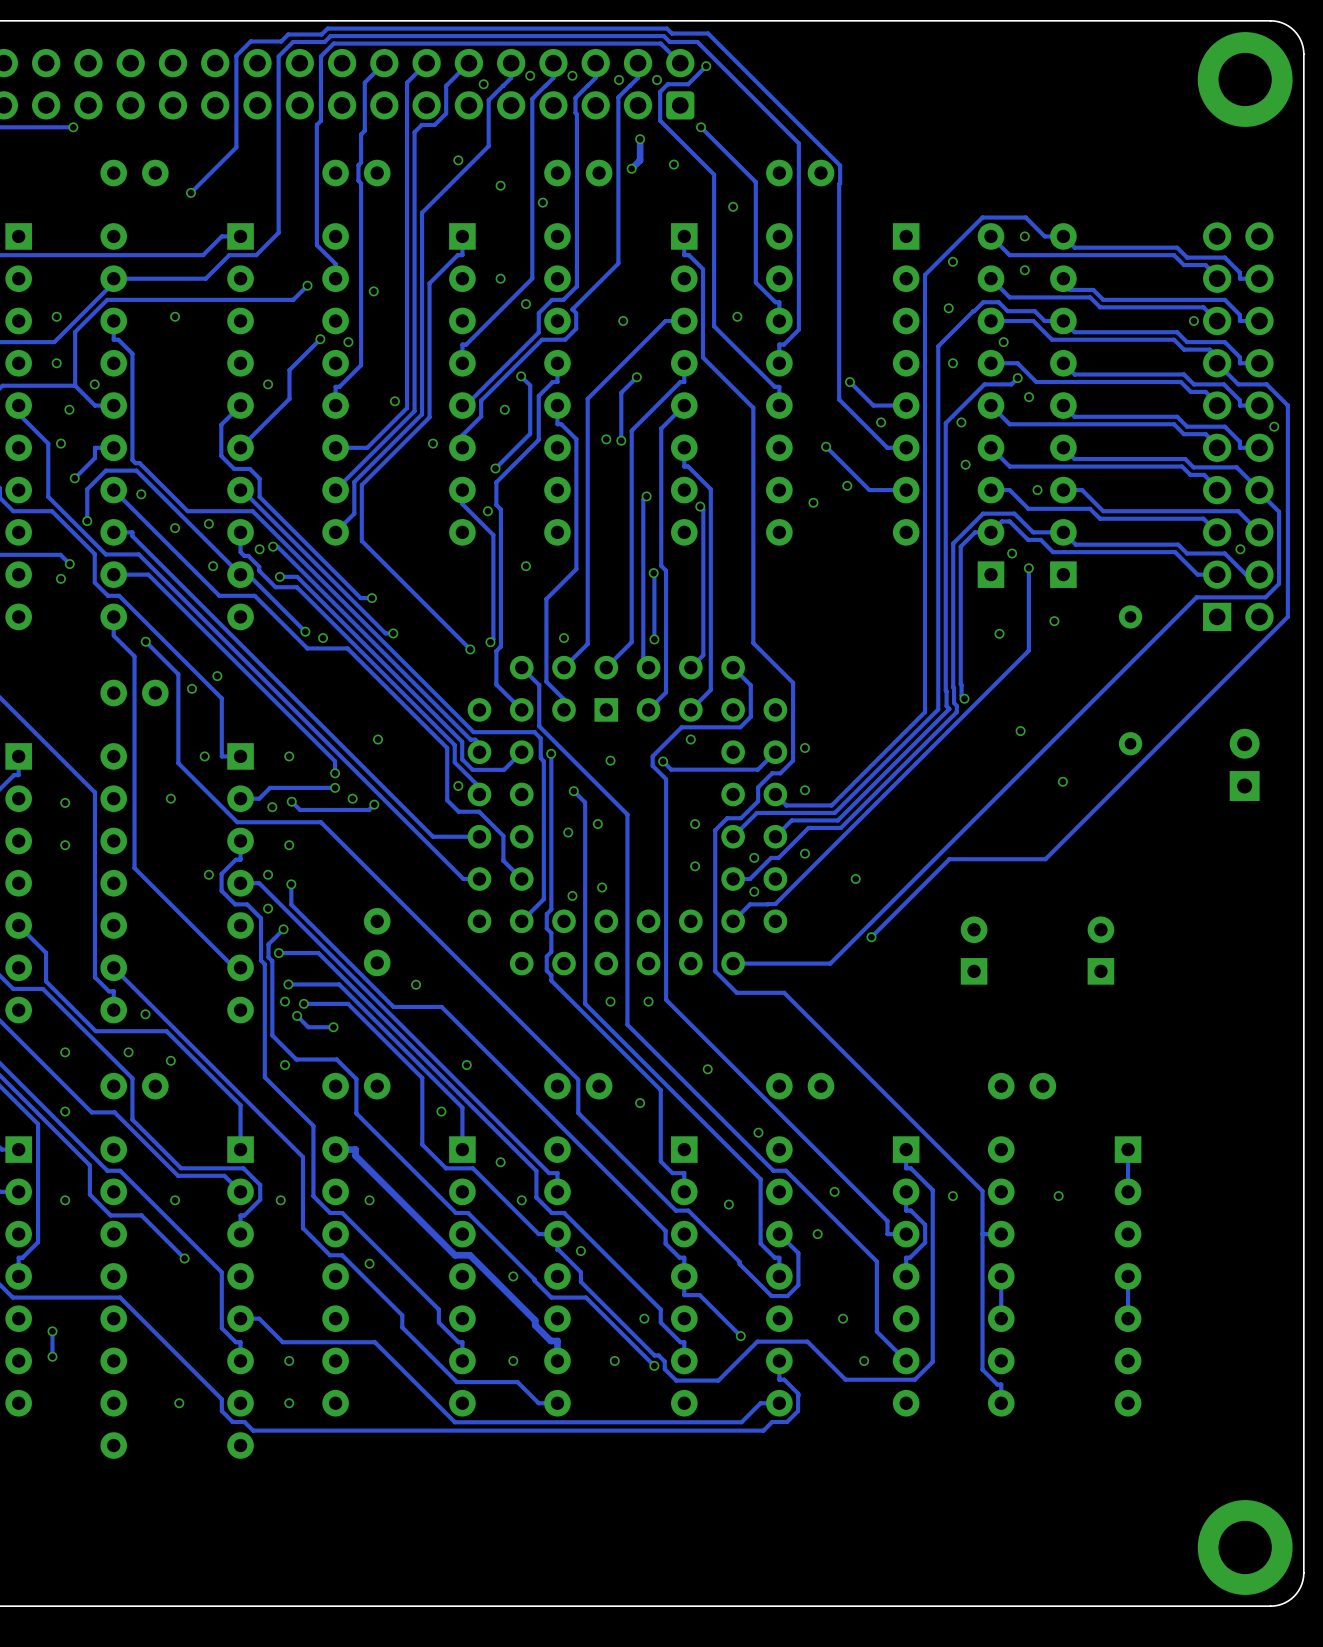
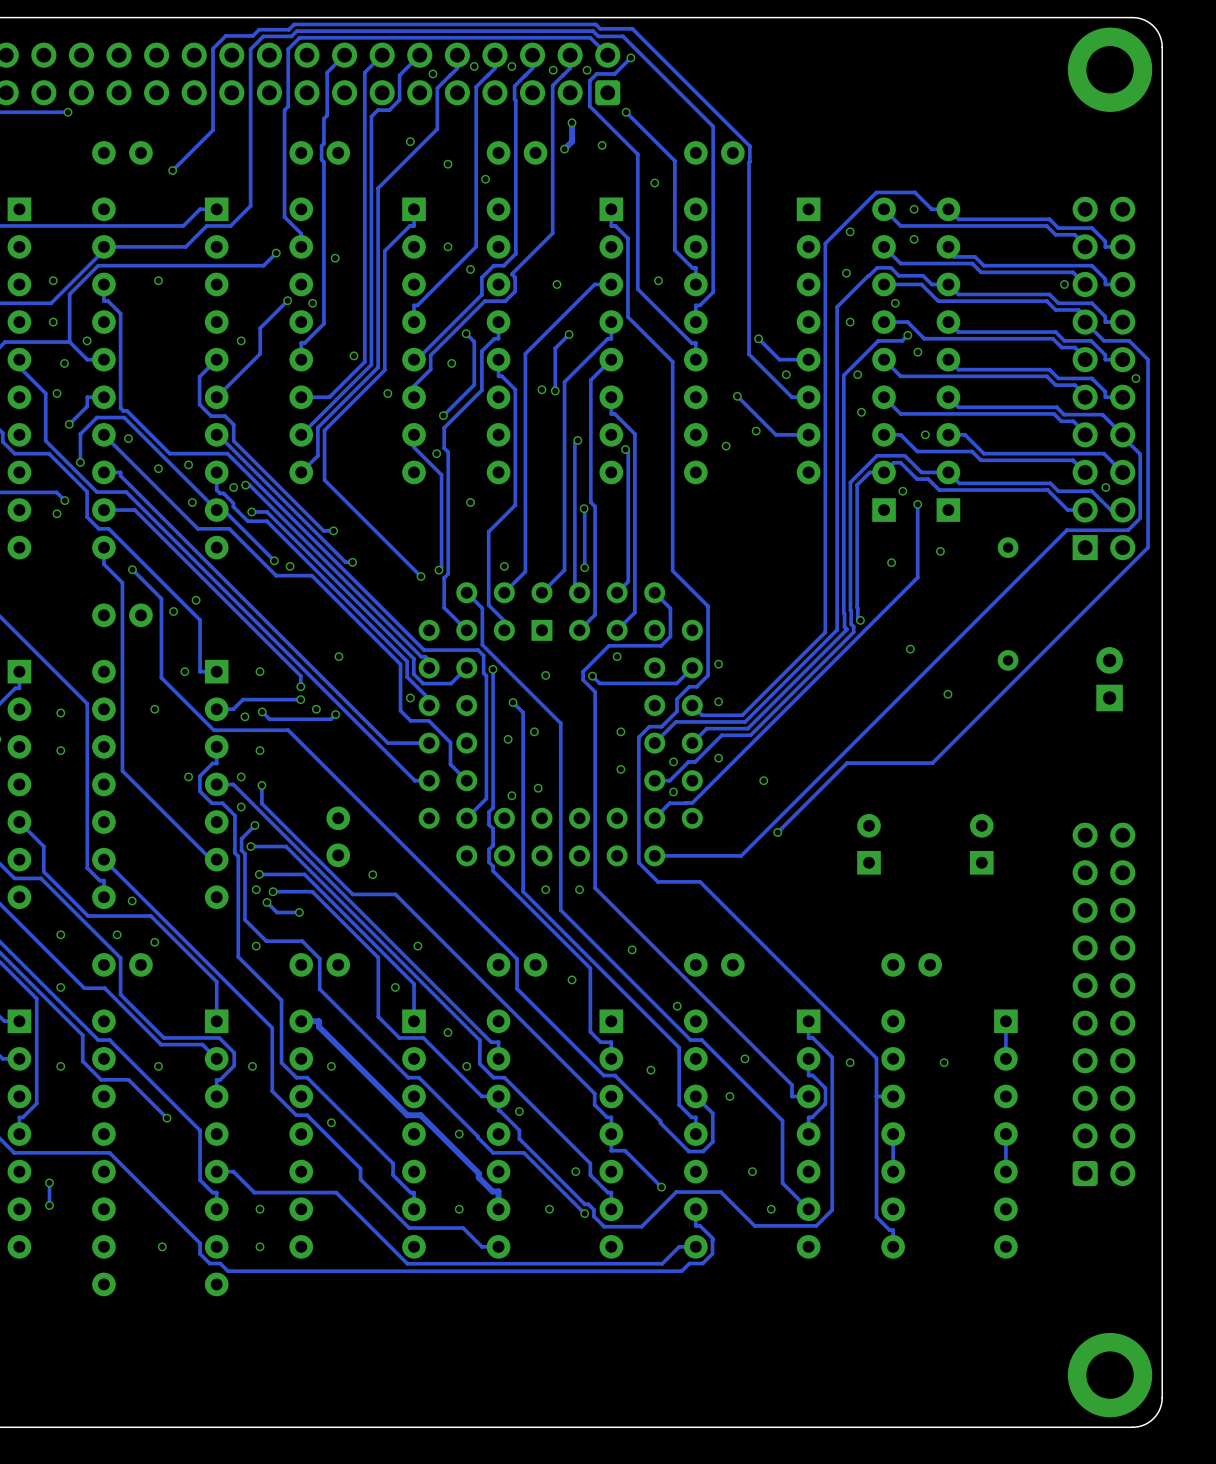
part: none -> (1103, 1004)

